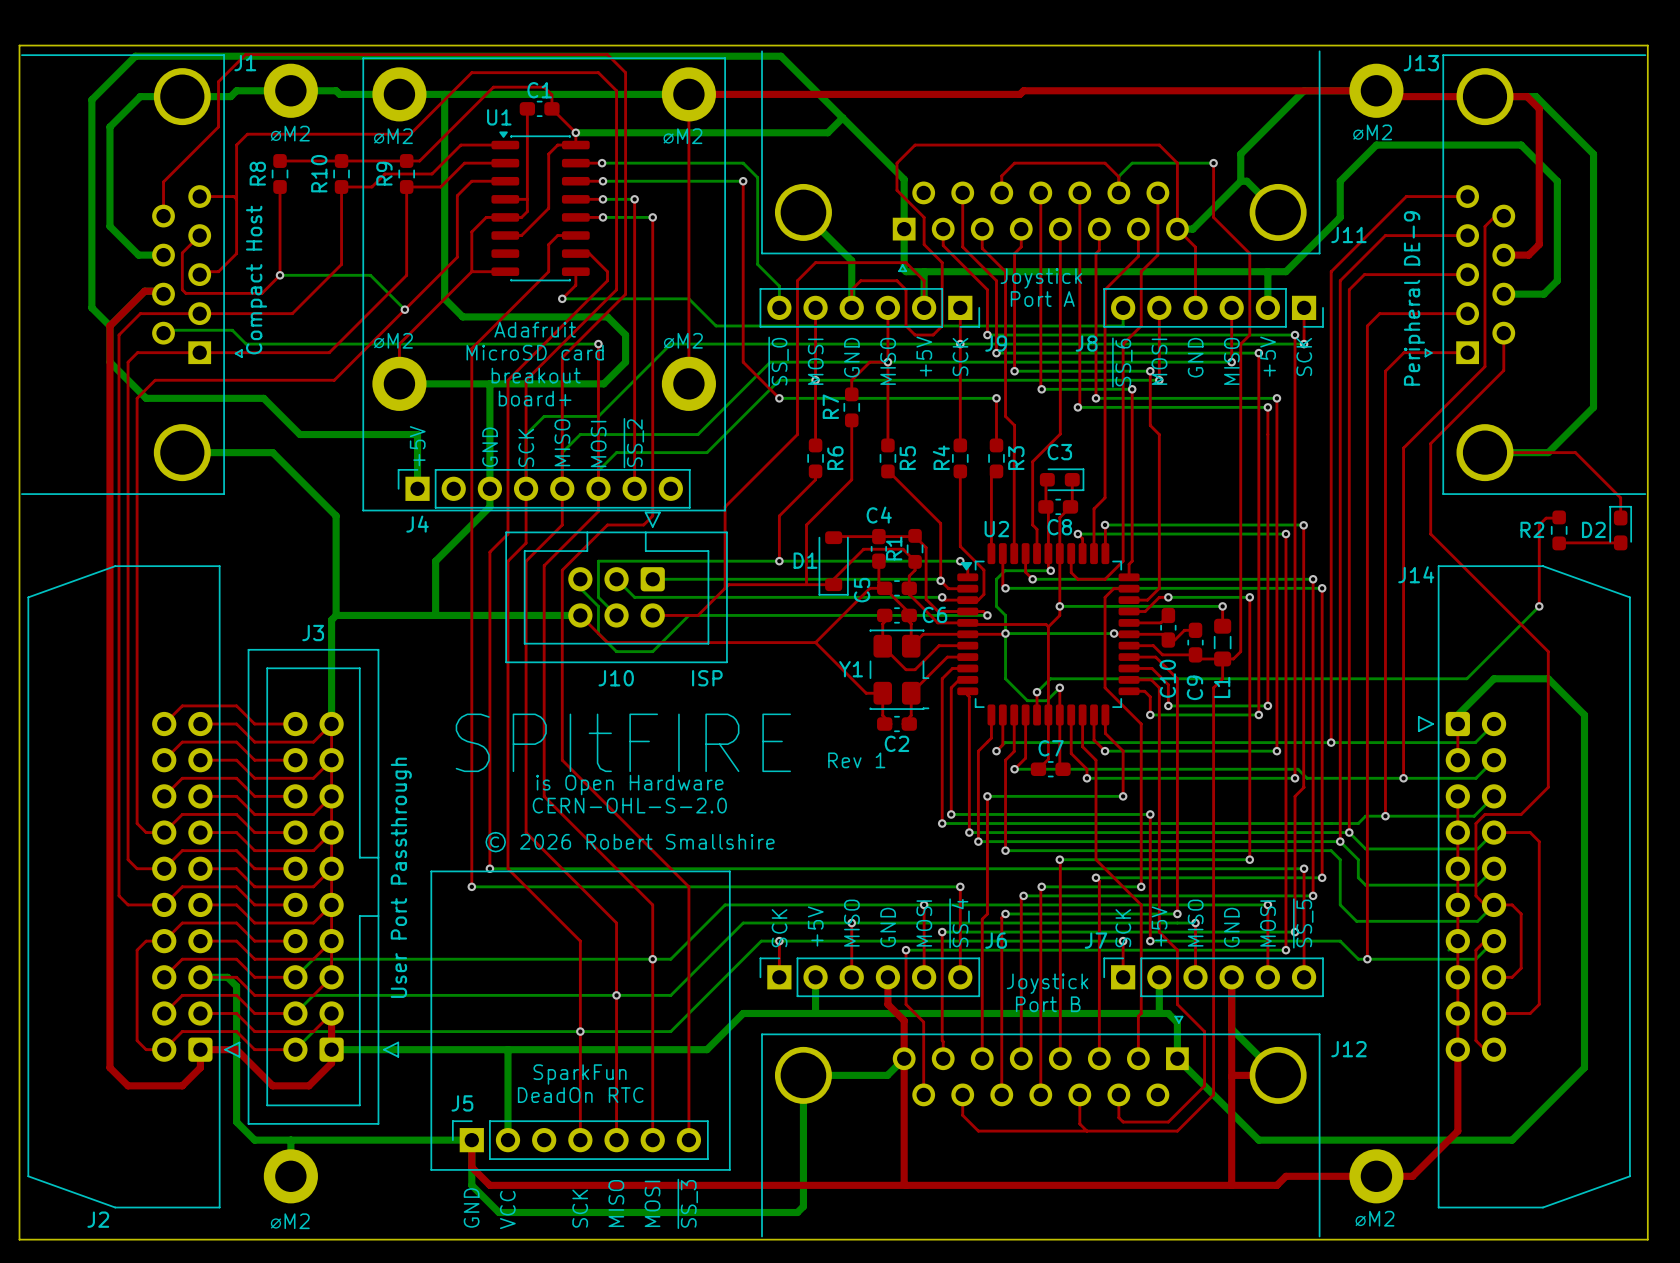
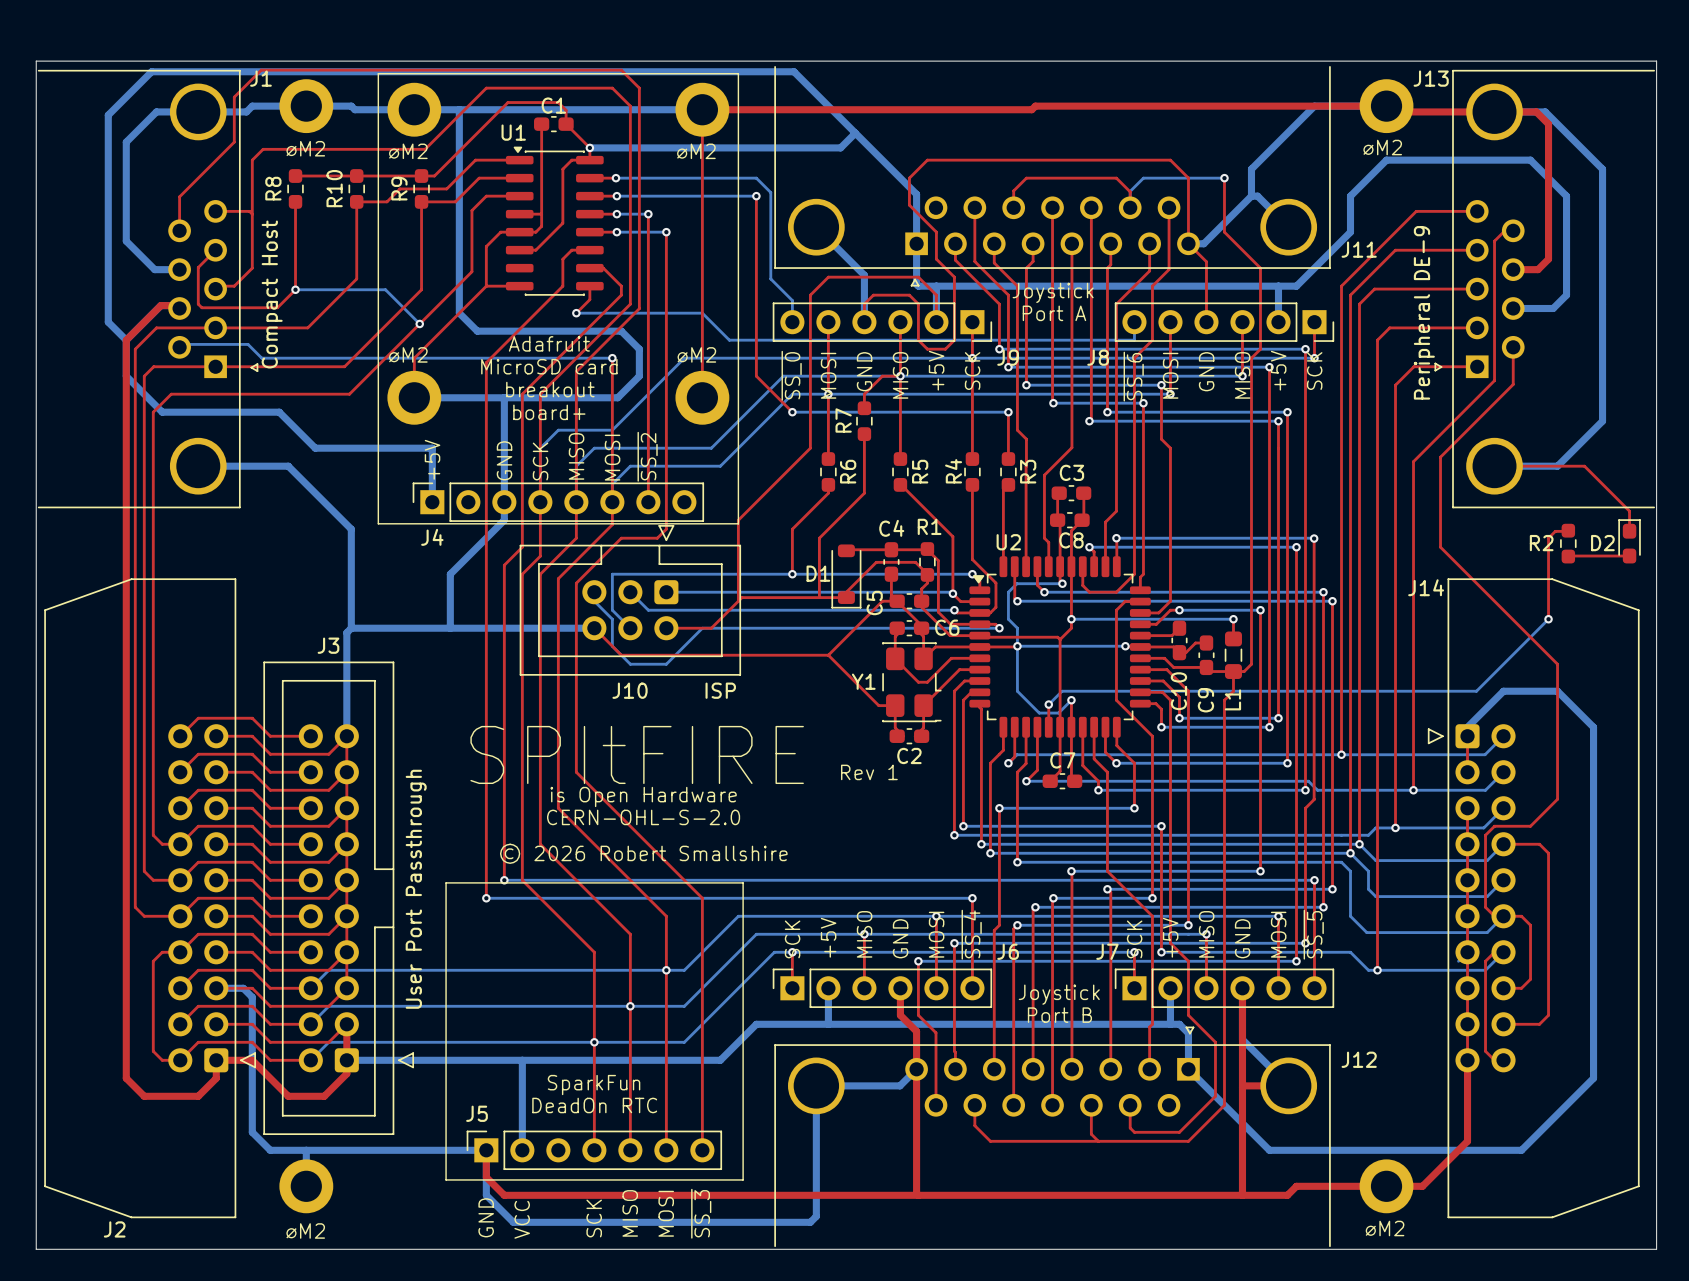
C3 footprint: [1039, 468, 1085, 492] -> [1051, 485, 1092, 502]
R1 name rotation: 0° (894, 548) -> 90° clockwise (929, 526)
R1 name position: R1 (894, 548) -> R1 (929, 526)

